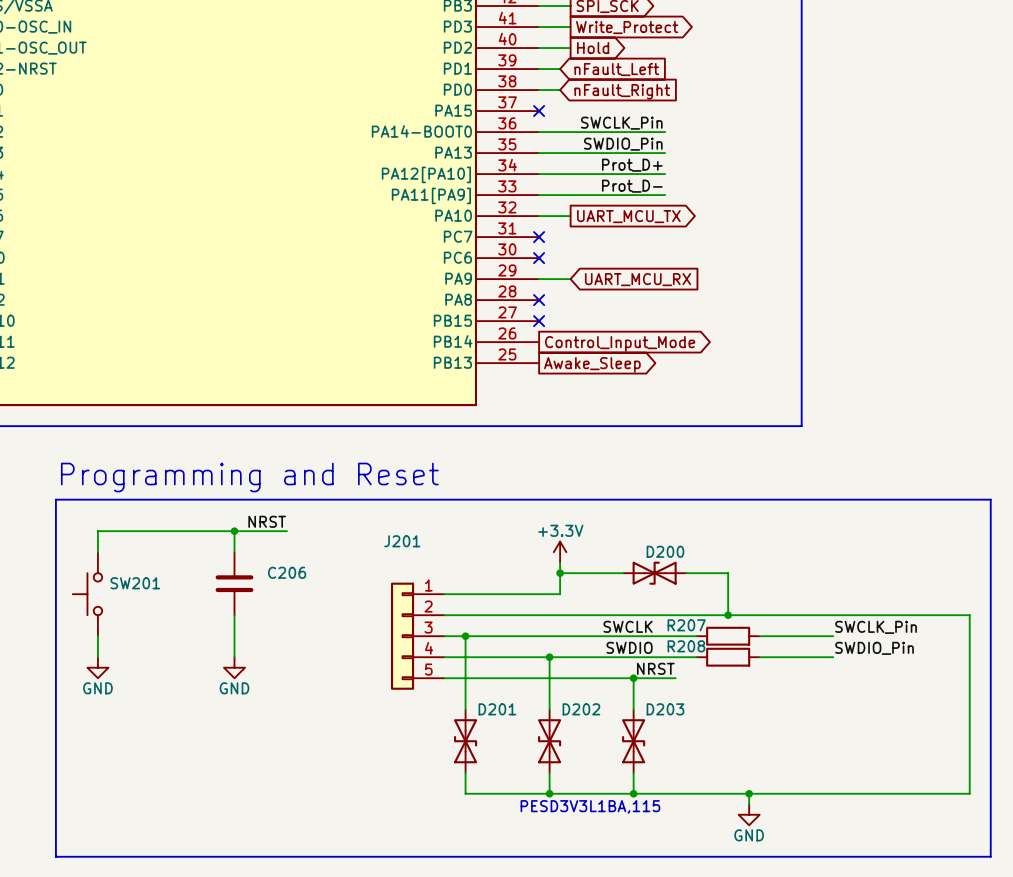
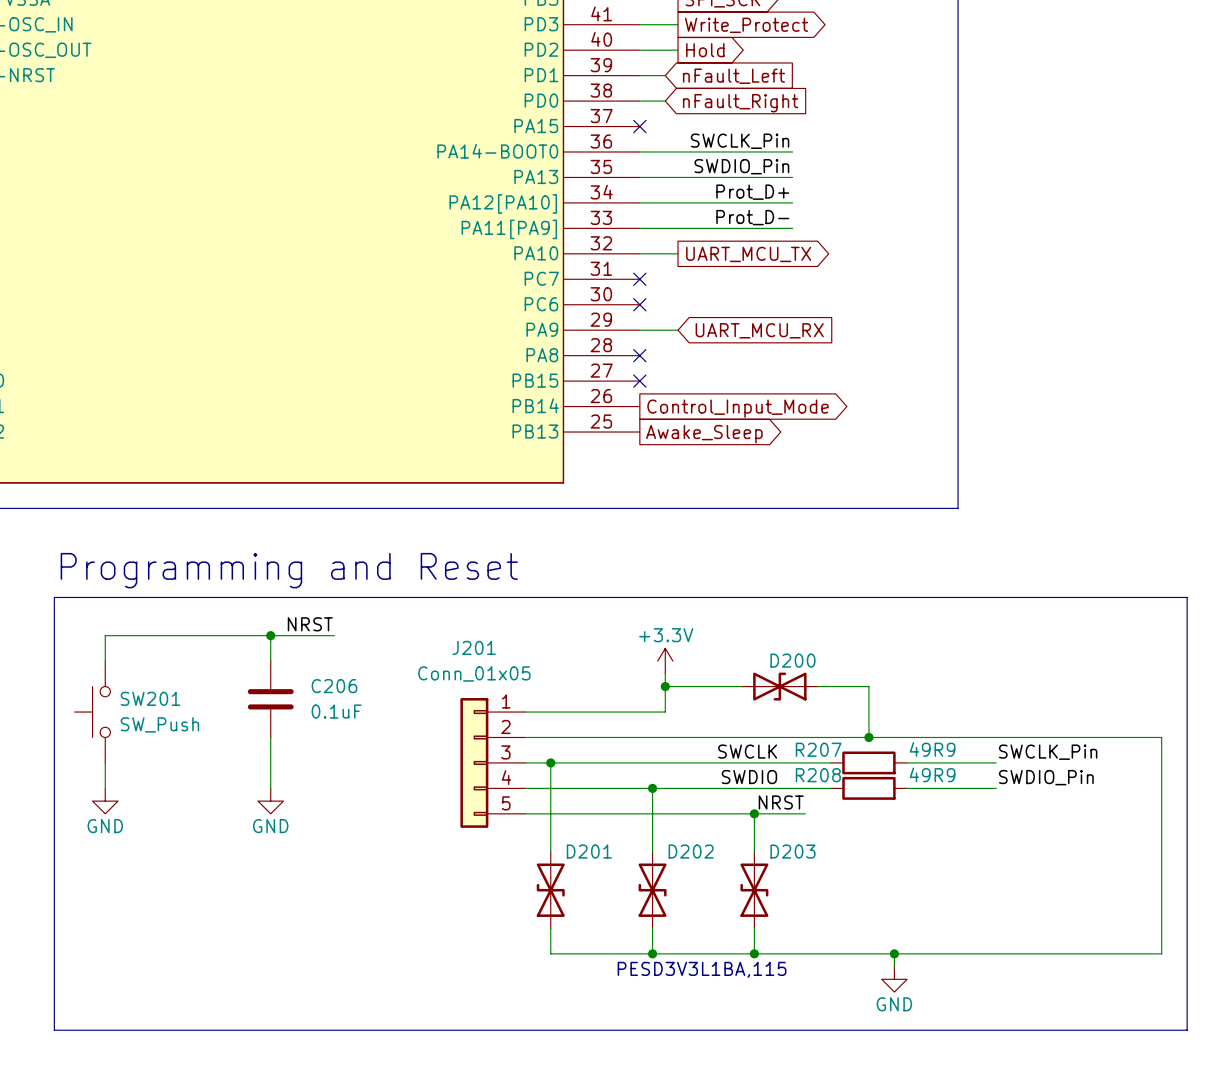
J201 value: none -> Conn_01x05 (474, 673)
C206 value: none -> 0.1uF (336, 711)
SW201 value: none -> SW_Push (159, 724)
R207 value: none -> 49R9 (932, 749)
R208 value: none -> 49R9 (932, 774)

